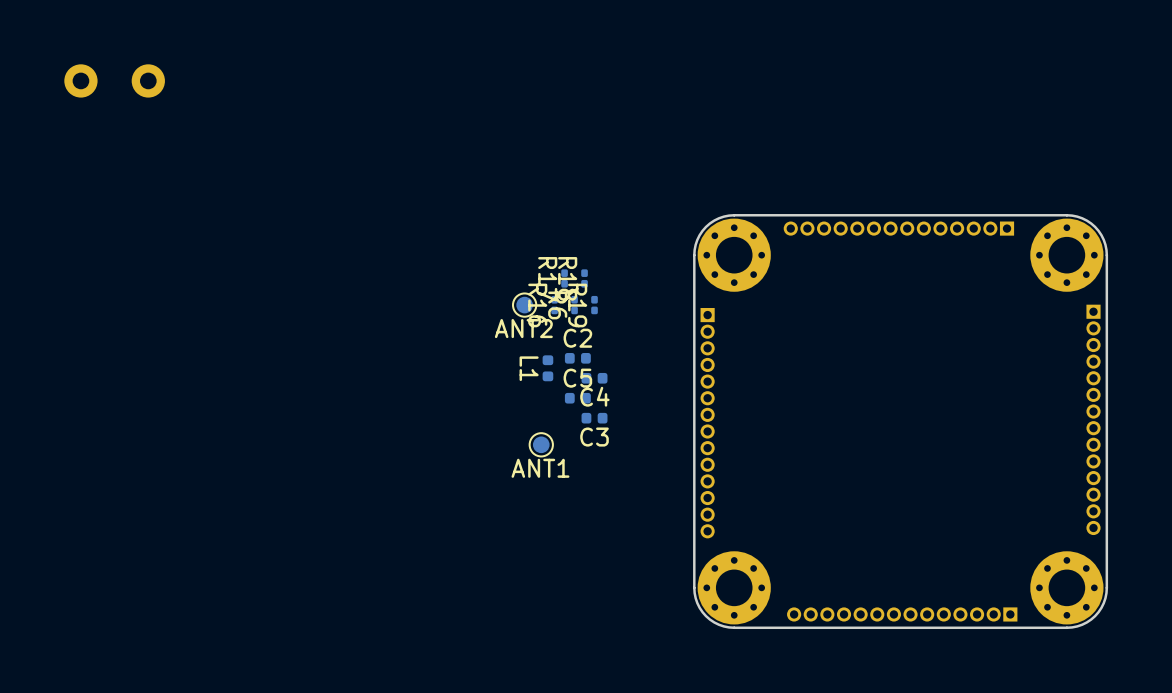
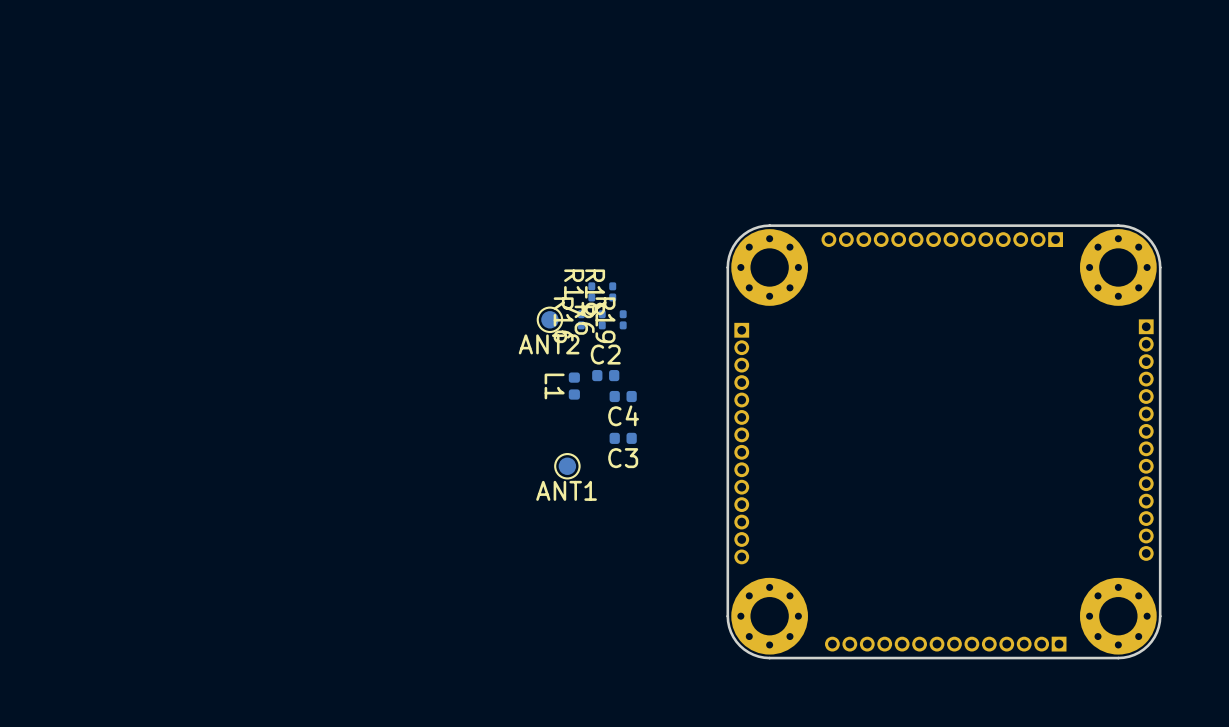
part: (80, 80) -> none
part: (148, 80) -> none
C5: (577, 398) -> none

